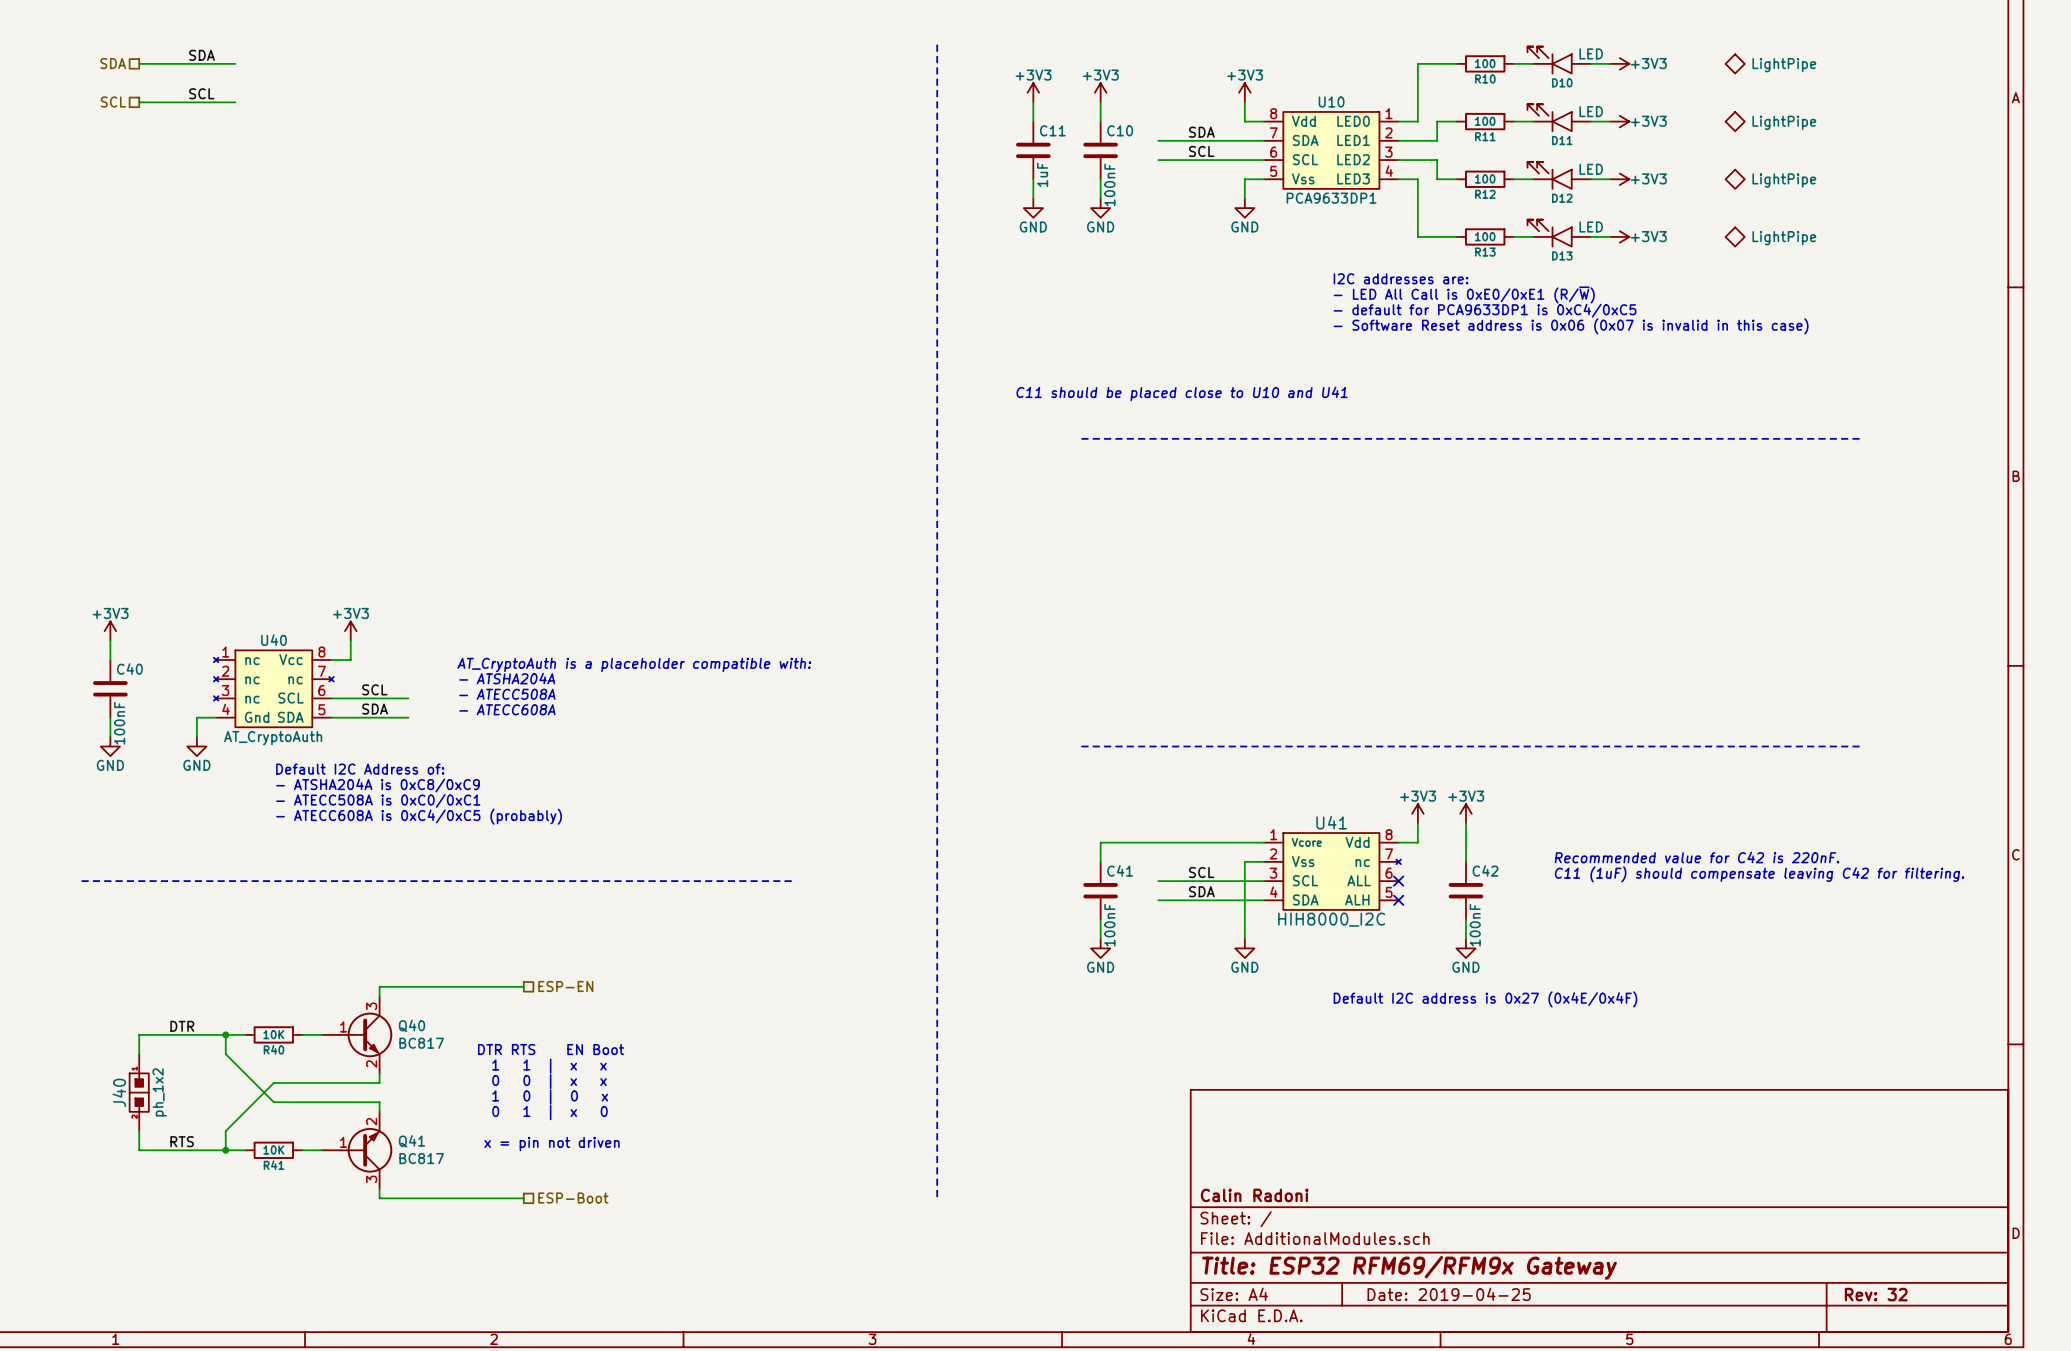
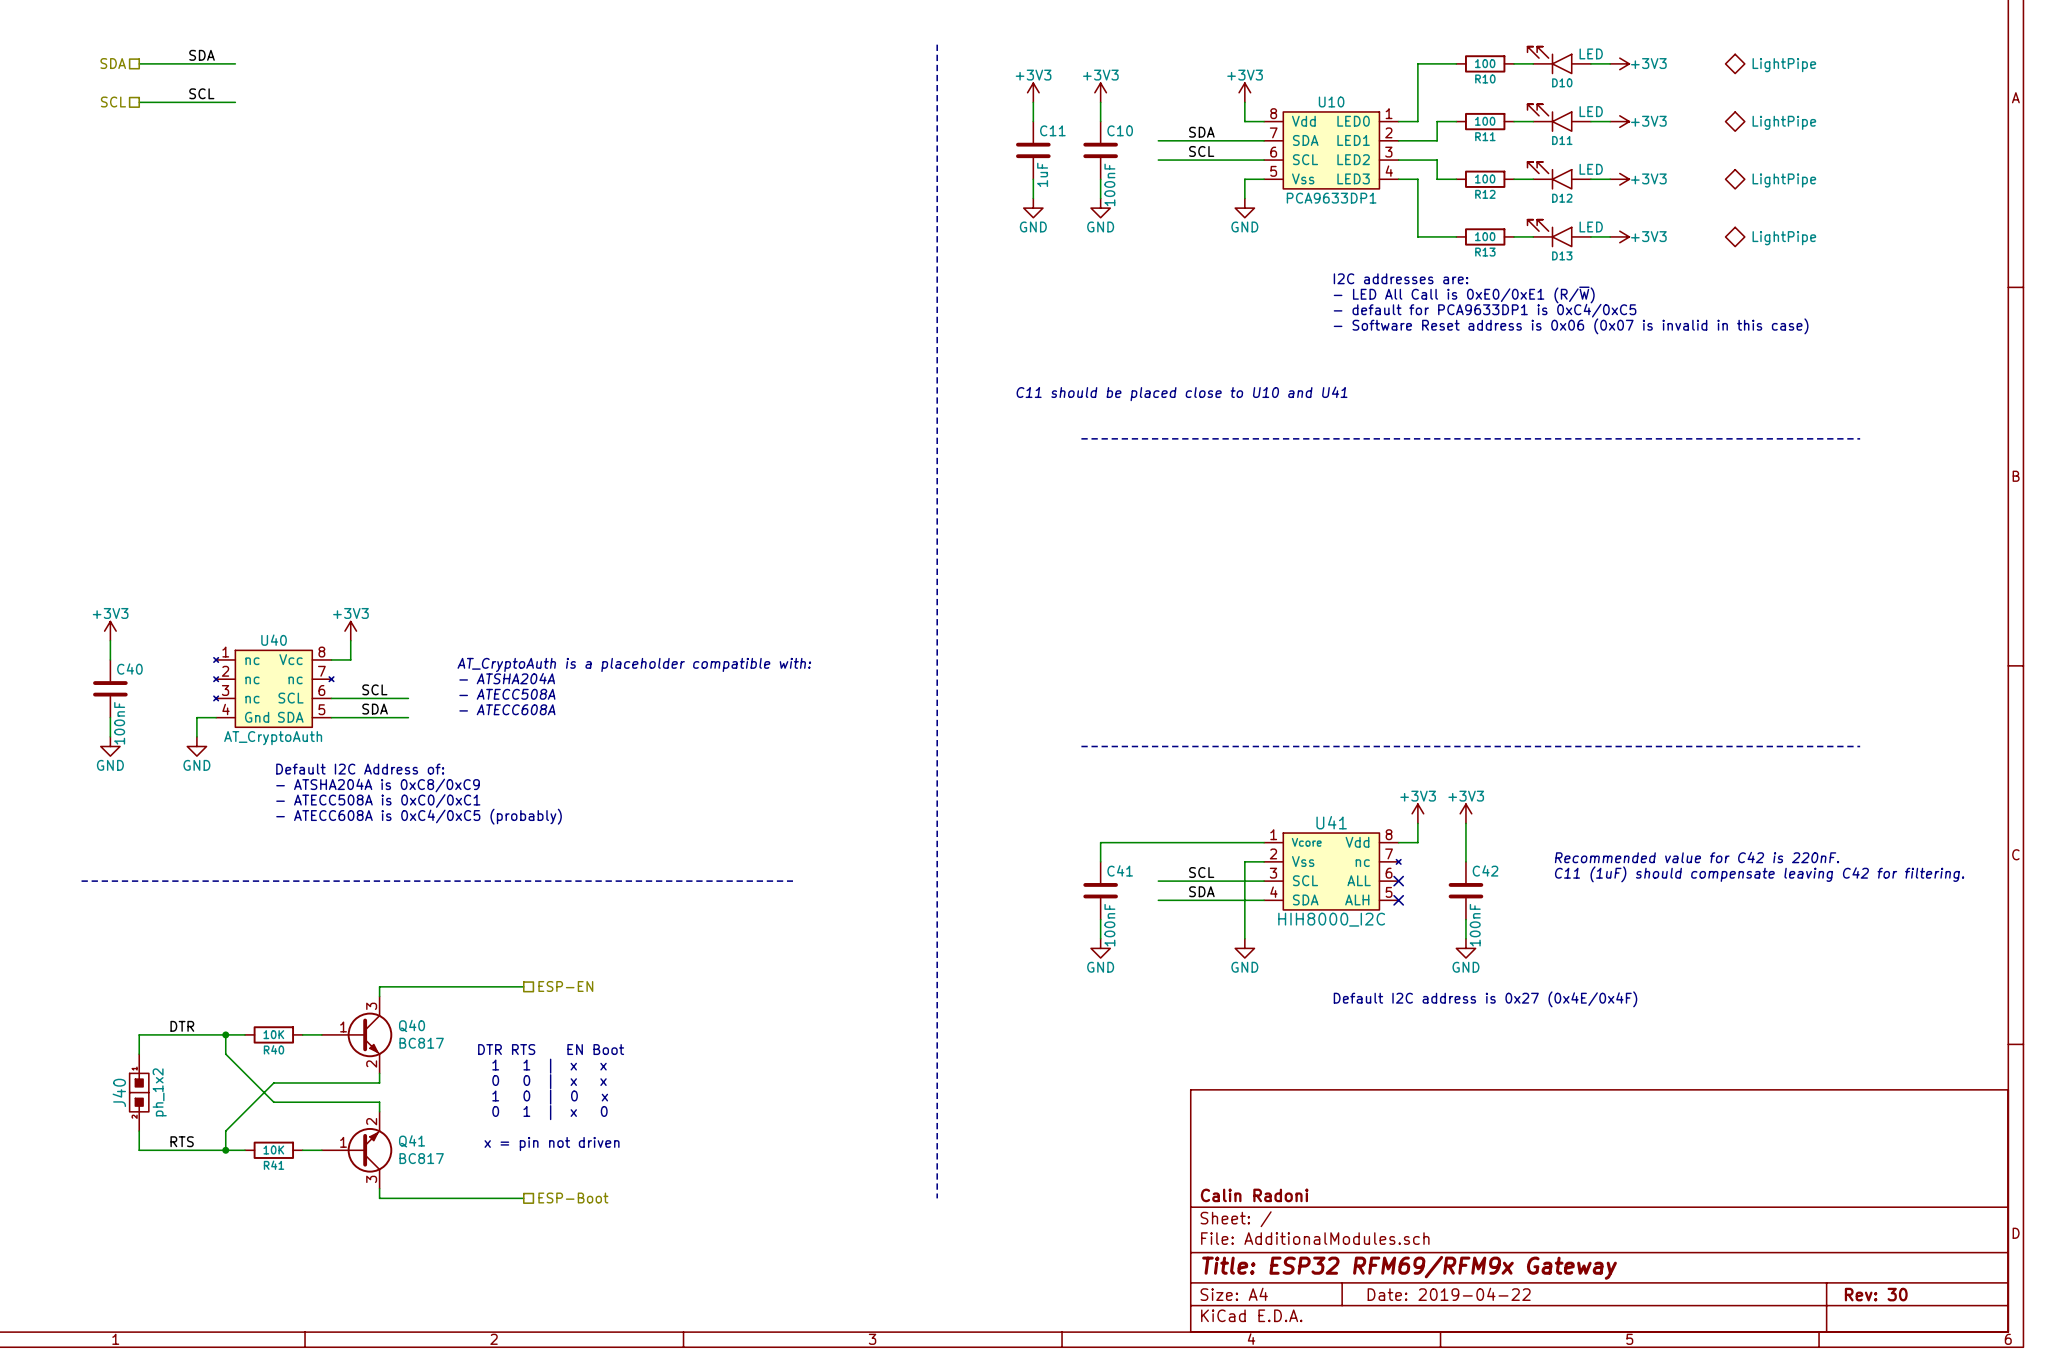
title block: Date: 2019-04-25 (1449, 1294) -> Date: 2019-04-22 (1449, 1294)
title block: Rev: 32 (1876, 1294) -> Rev: 30 (1876, 1294)

